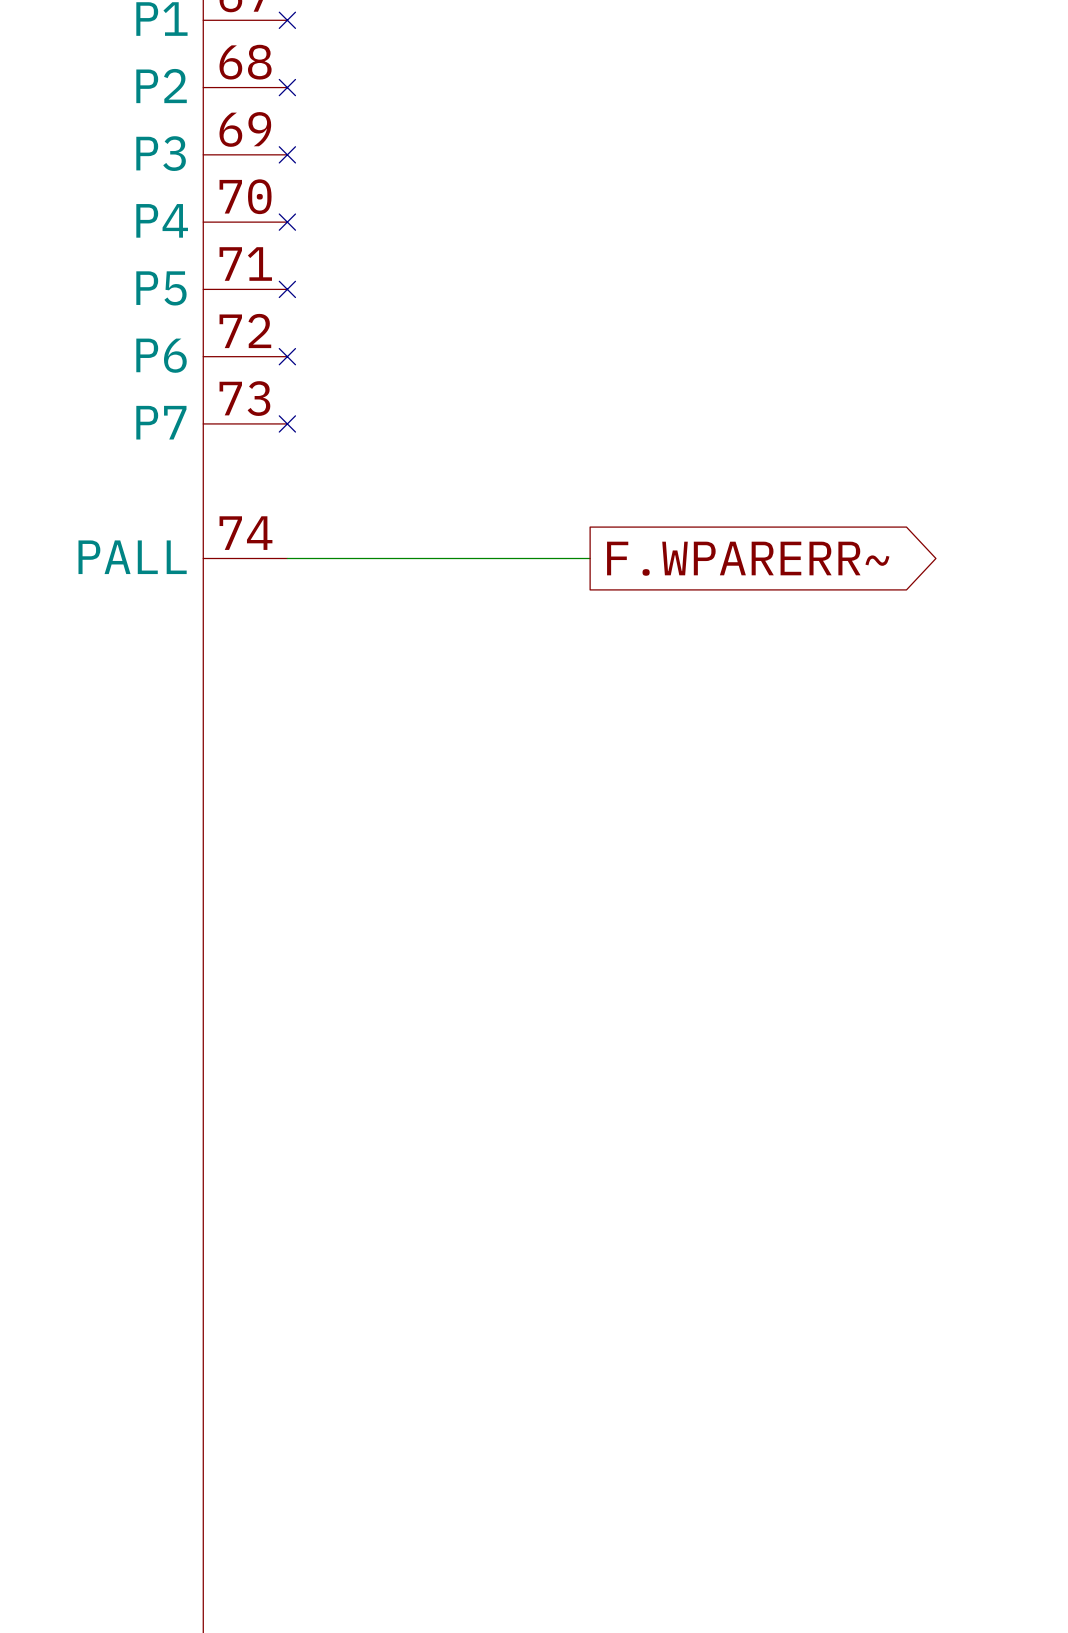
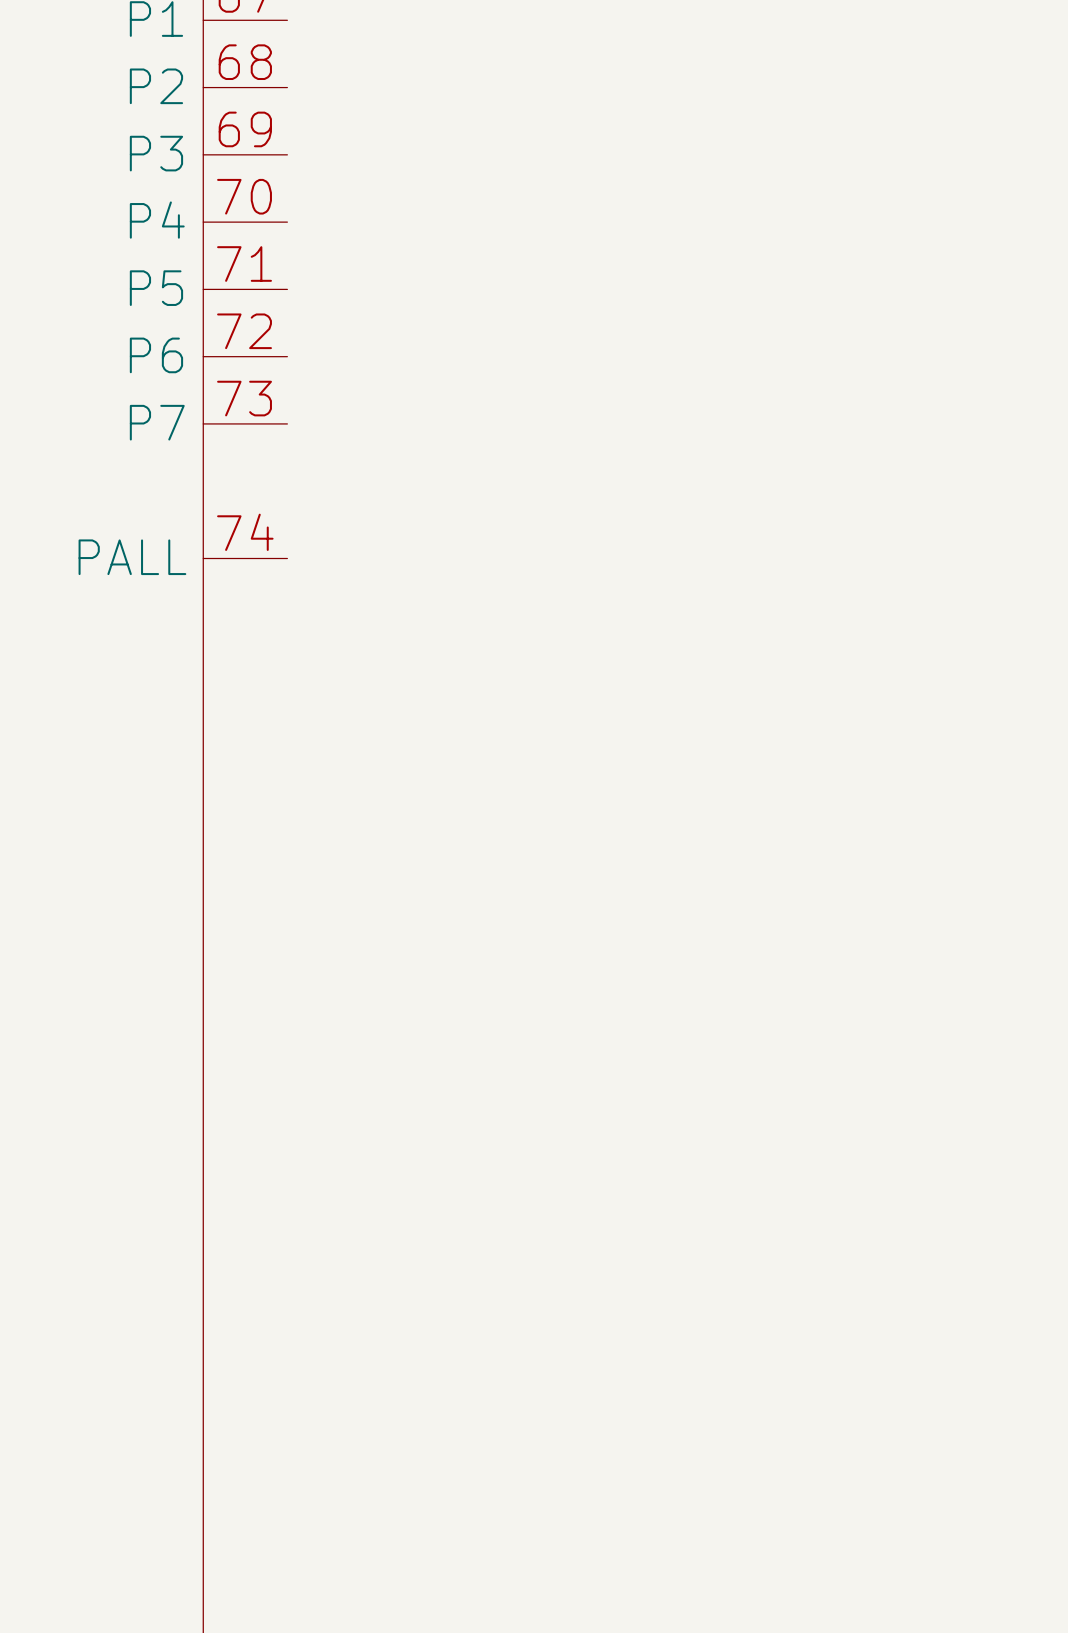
no-connect mark: (287, 20) -> none
no-connect mark: (287, 87) -> none
no-connect mark: (287, 154) -> none
no-connect mark: (287, 222) -> none
no-connect mark: (287, 289) -> none
no-connect mark: (287, 356) -> none
no-connect mark: (287, 423) -> none
wire: (287, 558) (590, 558) -> none
global label: F.WPARERR~ (748, 558) -> none

